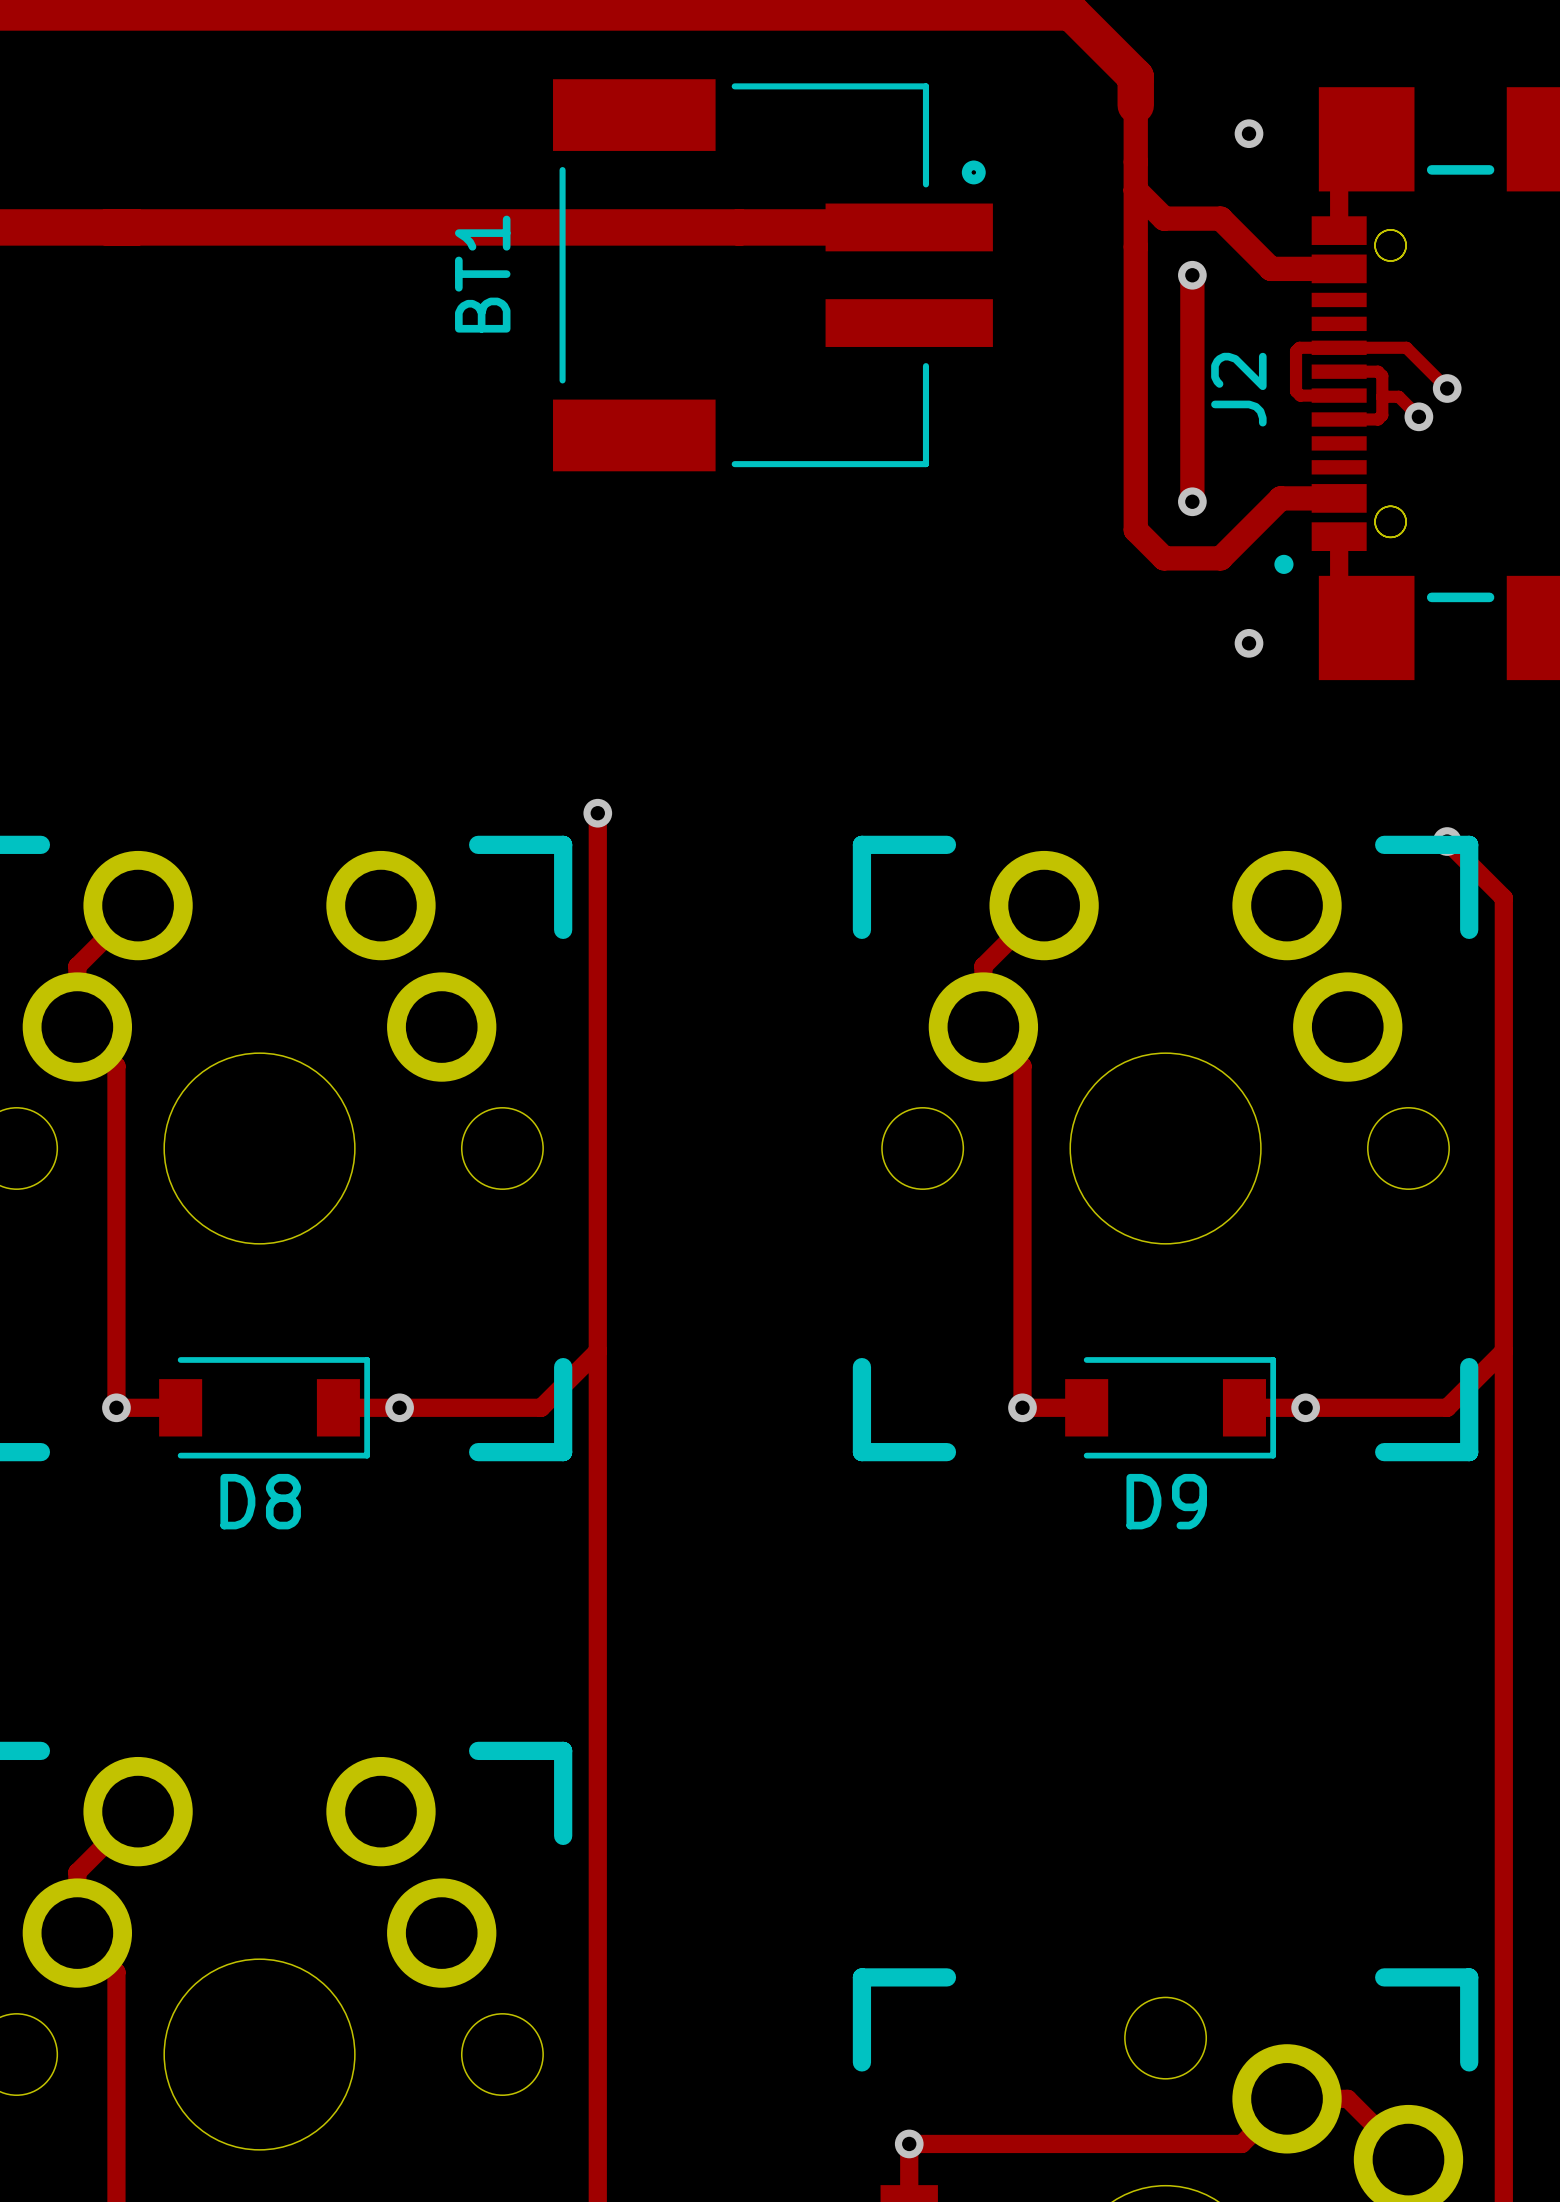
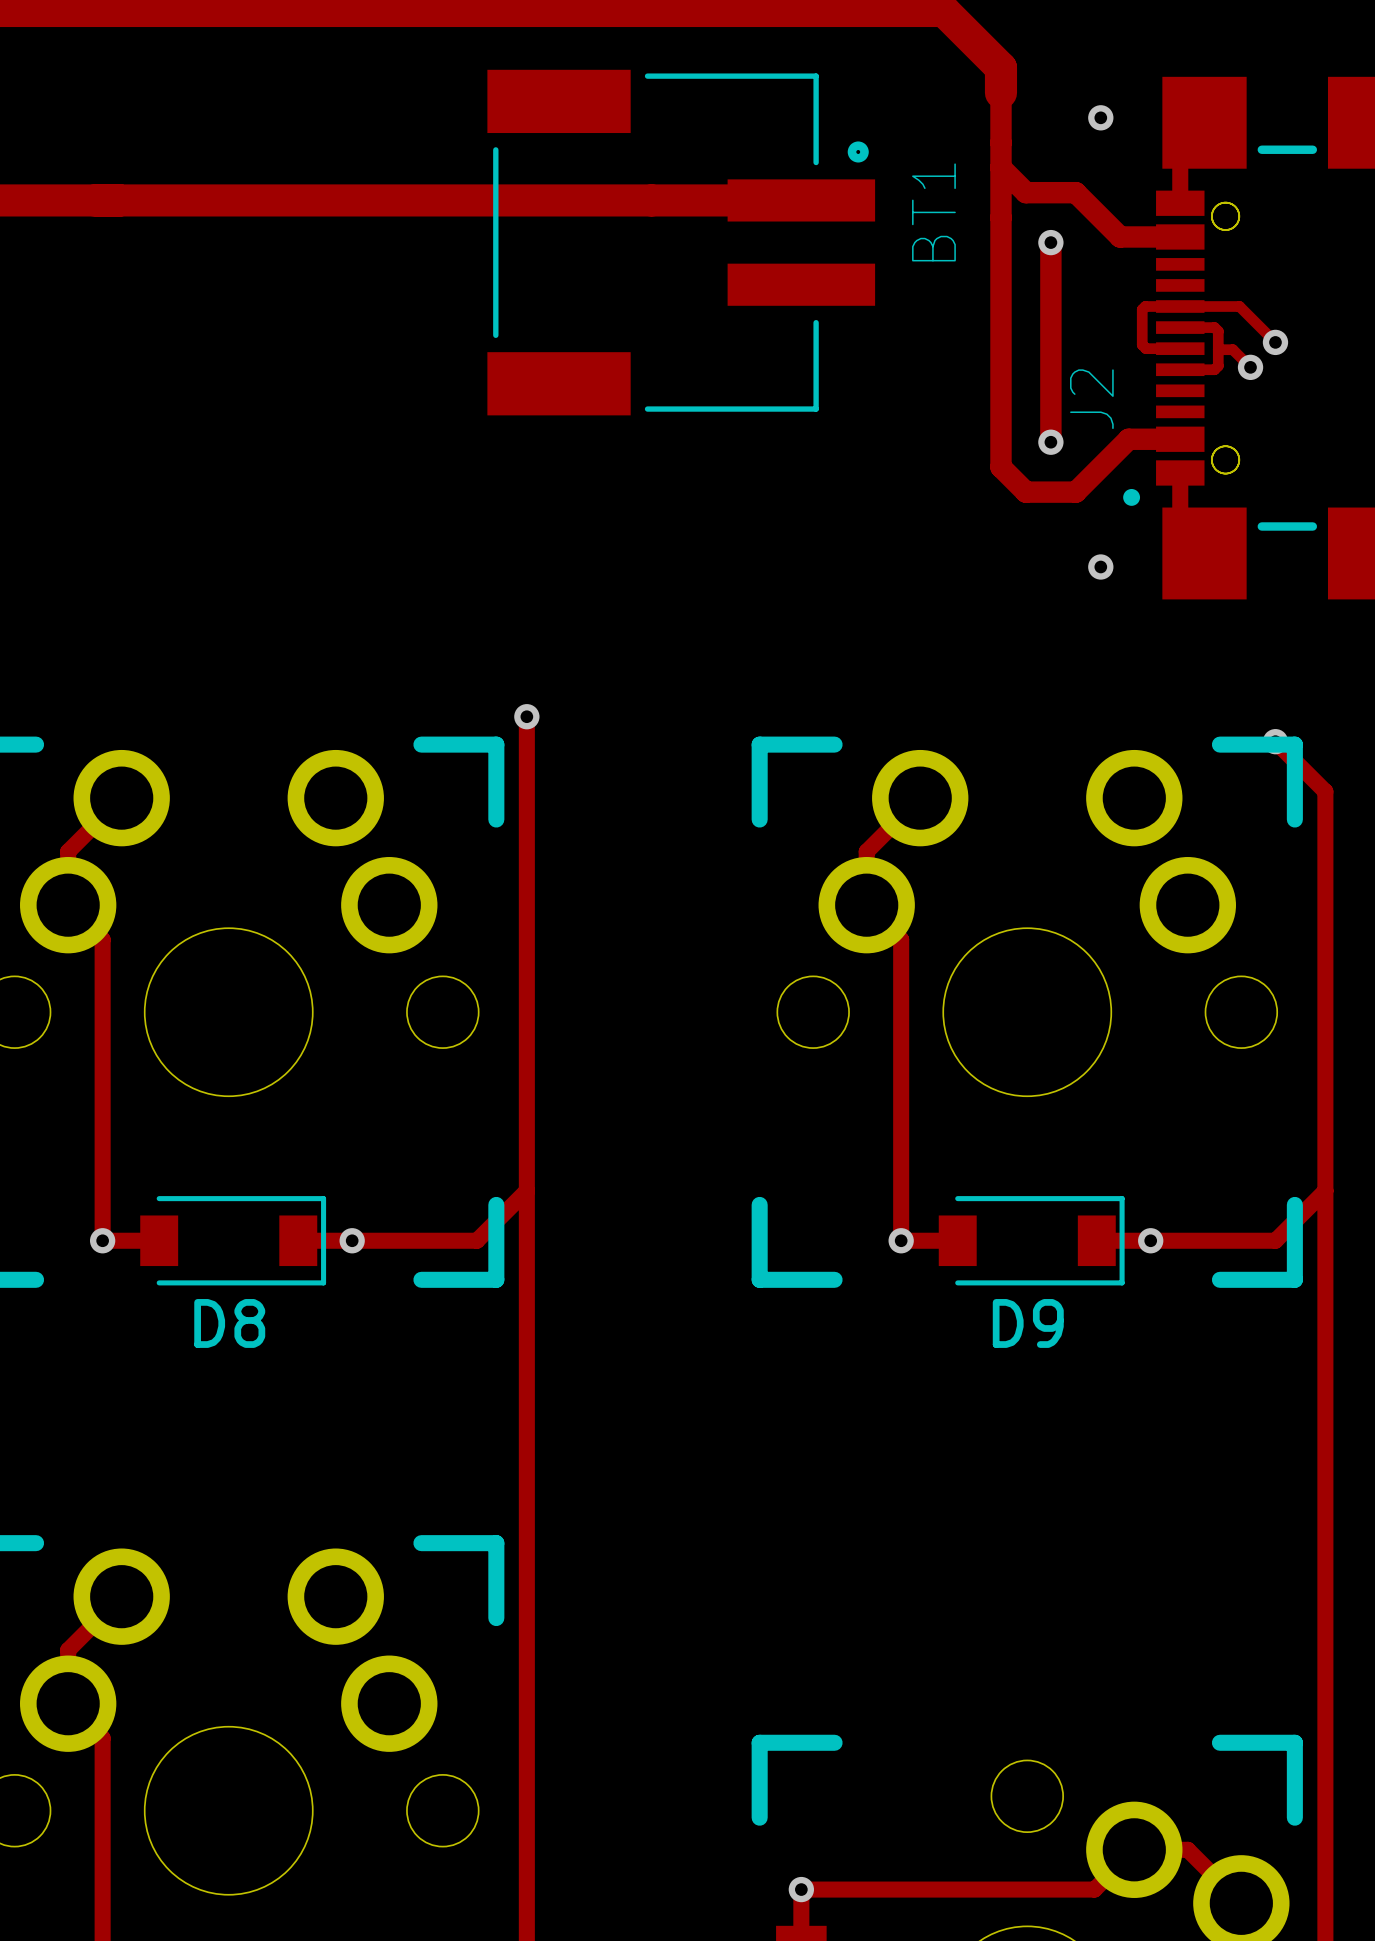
BT1 name position: BT1 (482, 274) -> BT1 (933, 212)
J2 name position: J2 (1238, 389) -> J2 (1091, 399)

